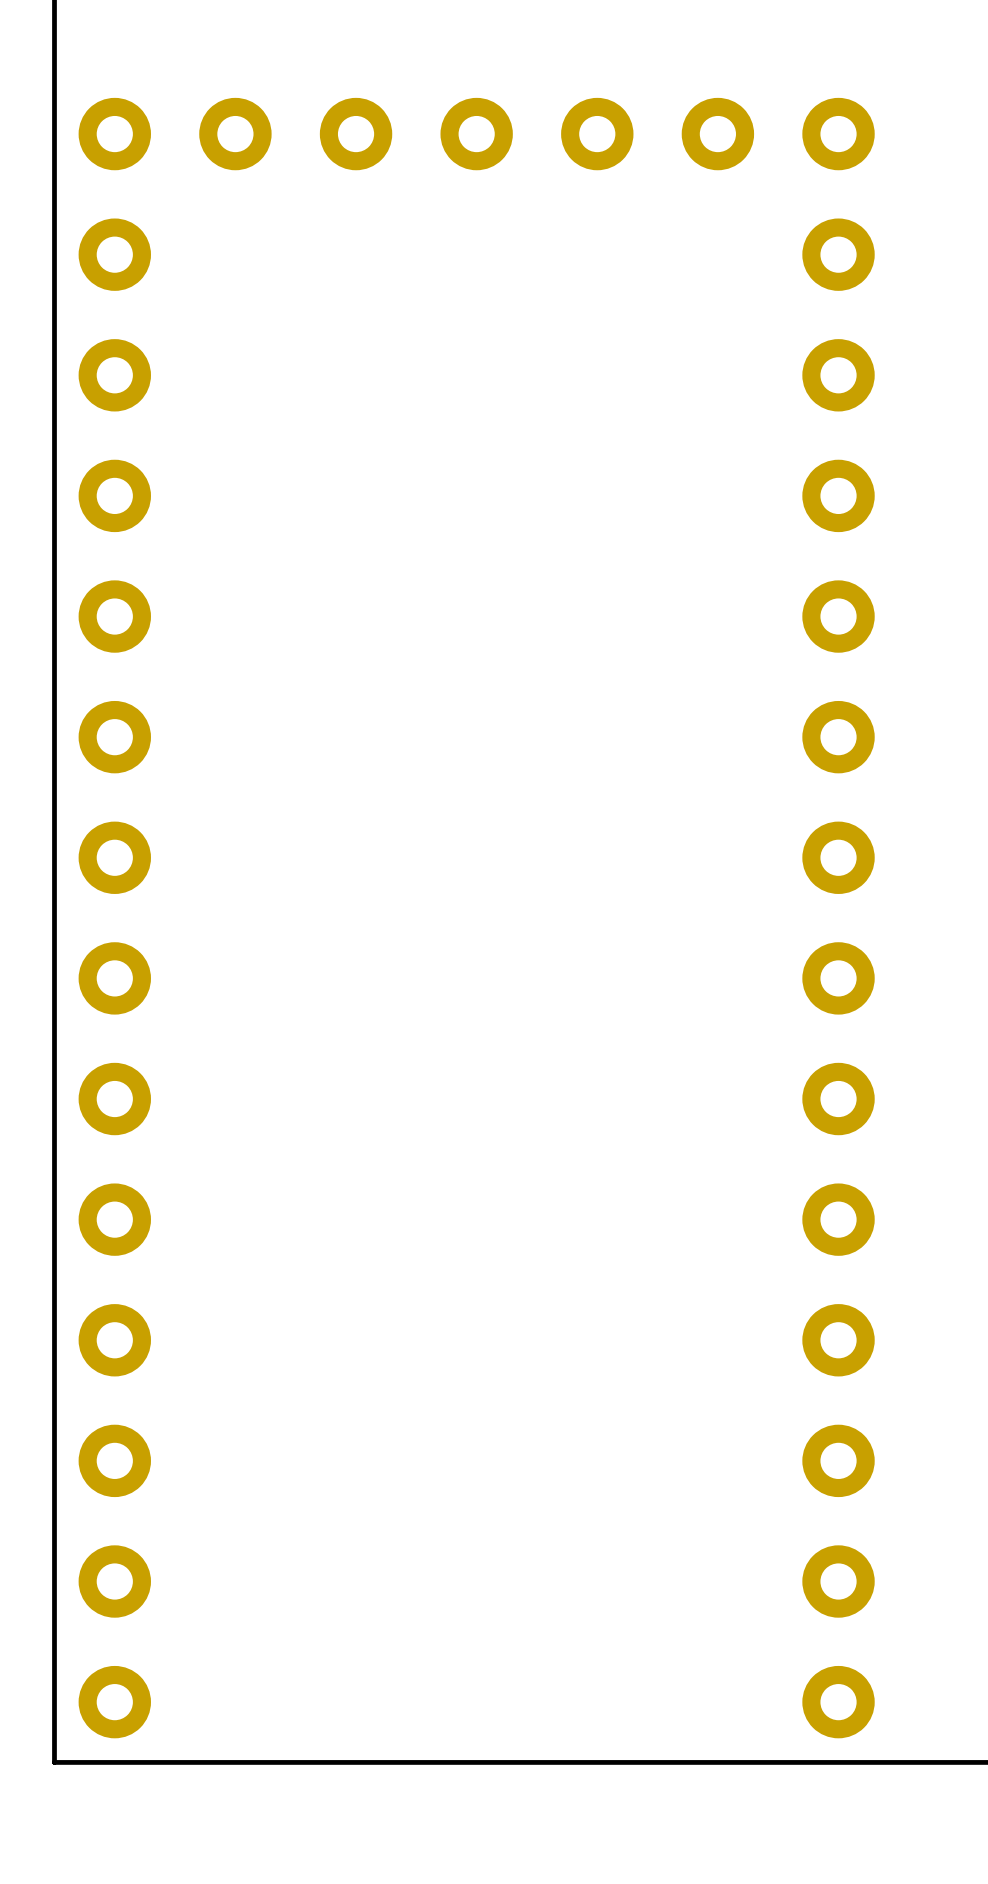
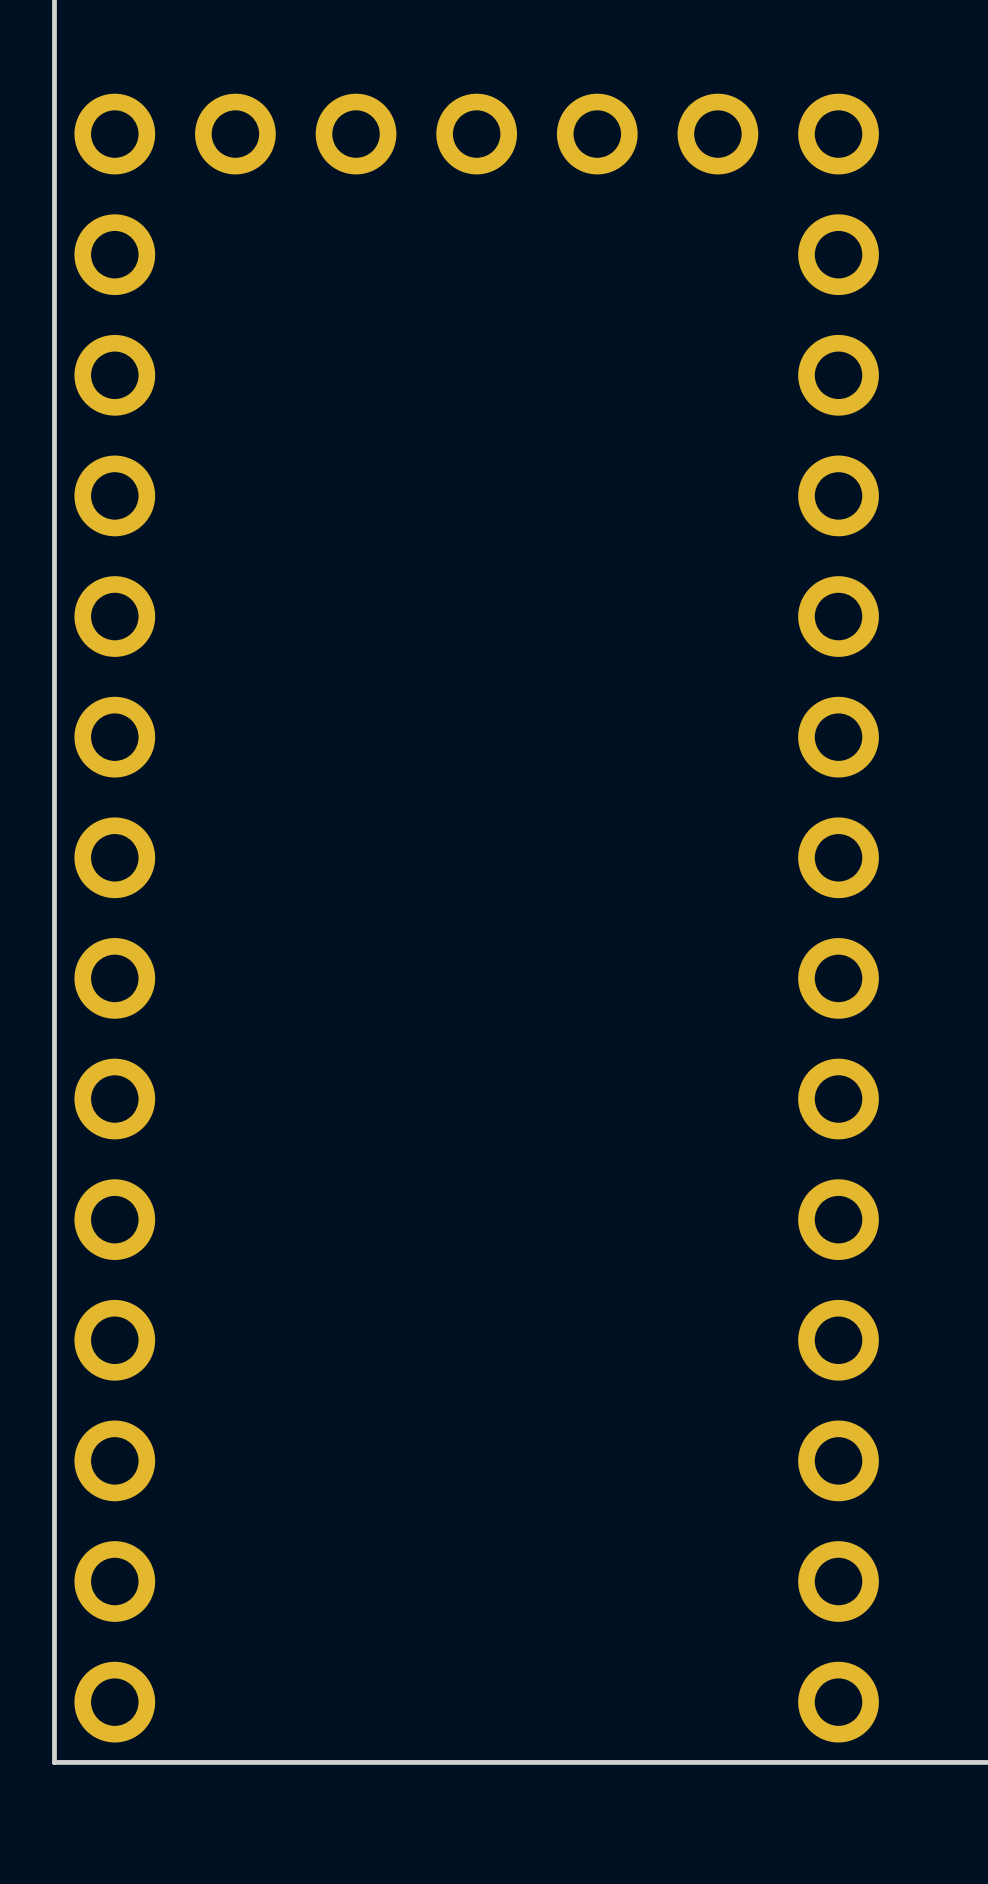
part footprint: [78, 97, 875, 1739] -> [74, 93, 879, 1743]

